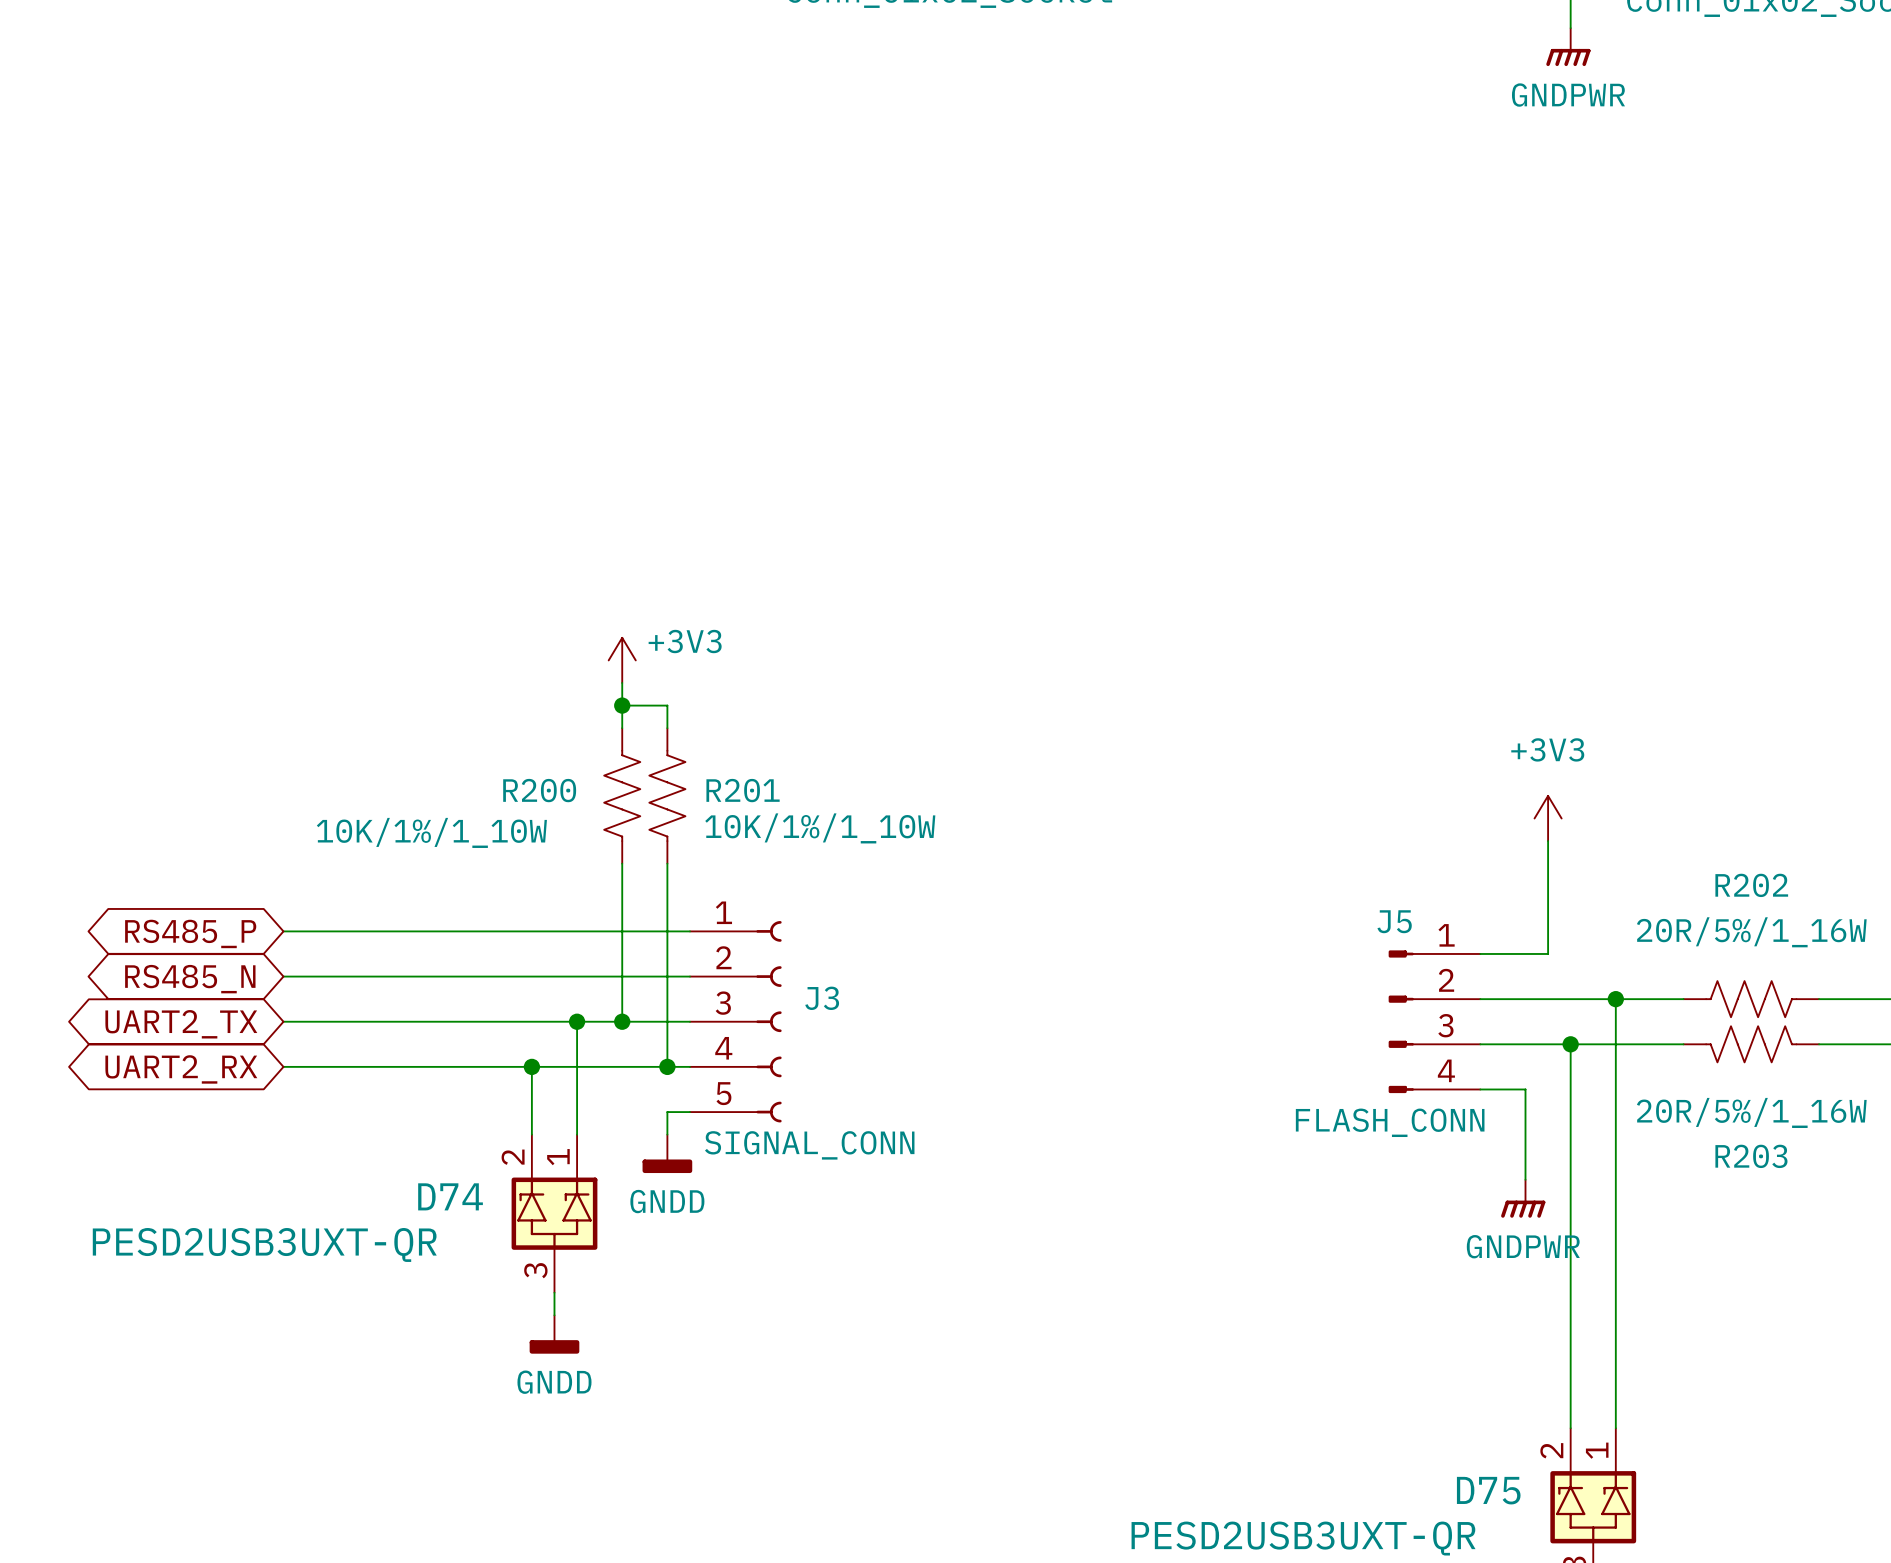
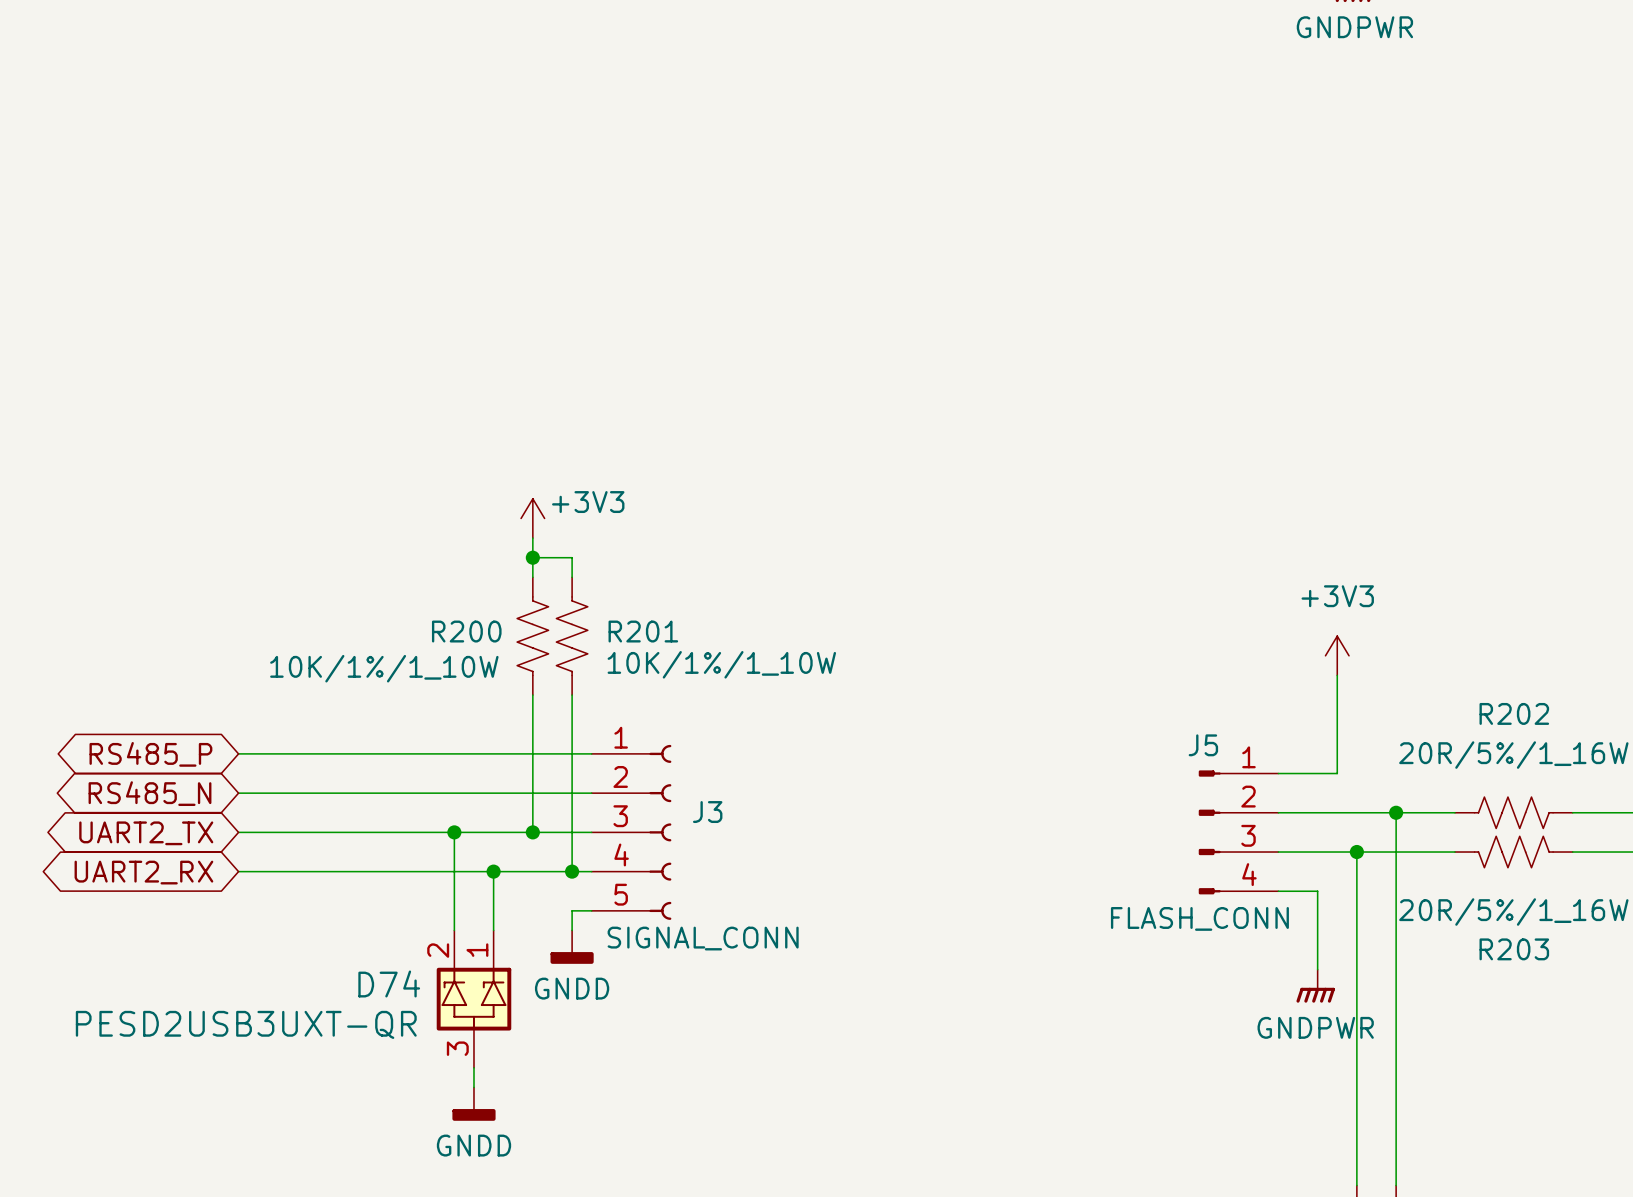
junction: none -> (454, 832)
wire: (577, 1021) (577, 1066) -> (454, 832) (454, 871)
junction: (577, 1021) -> none
junction: (531, 1066) -> none
junction: none -> (493, 871)

